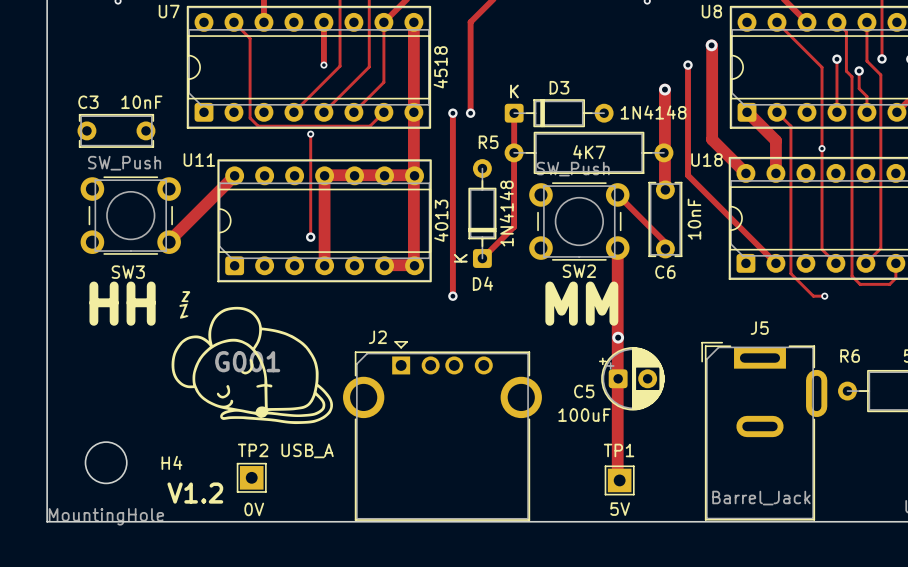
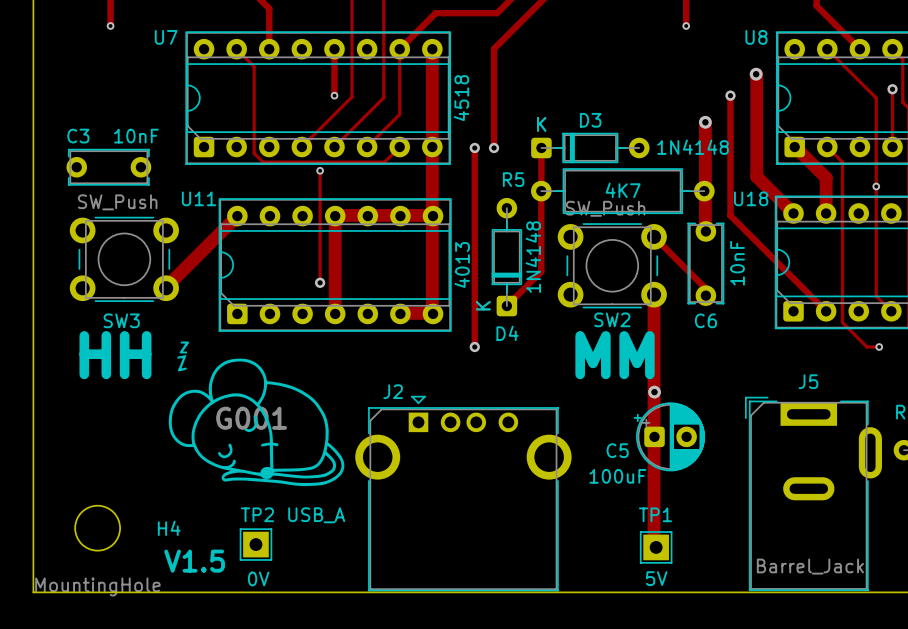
text: V1.2 (195, 493) -> V1.5 (194, 561)

